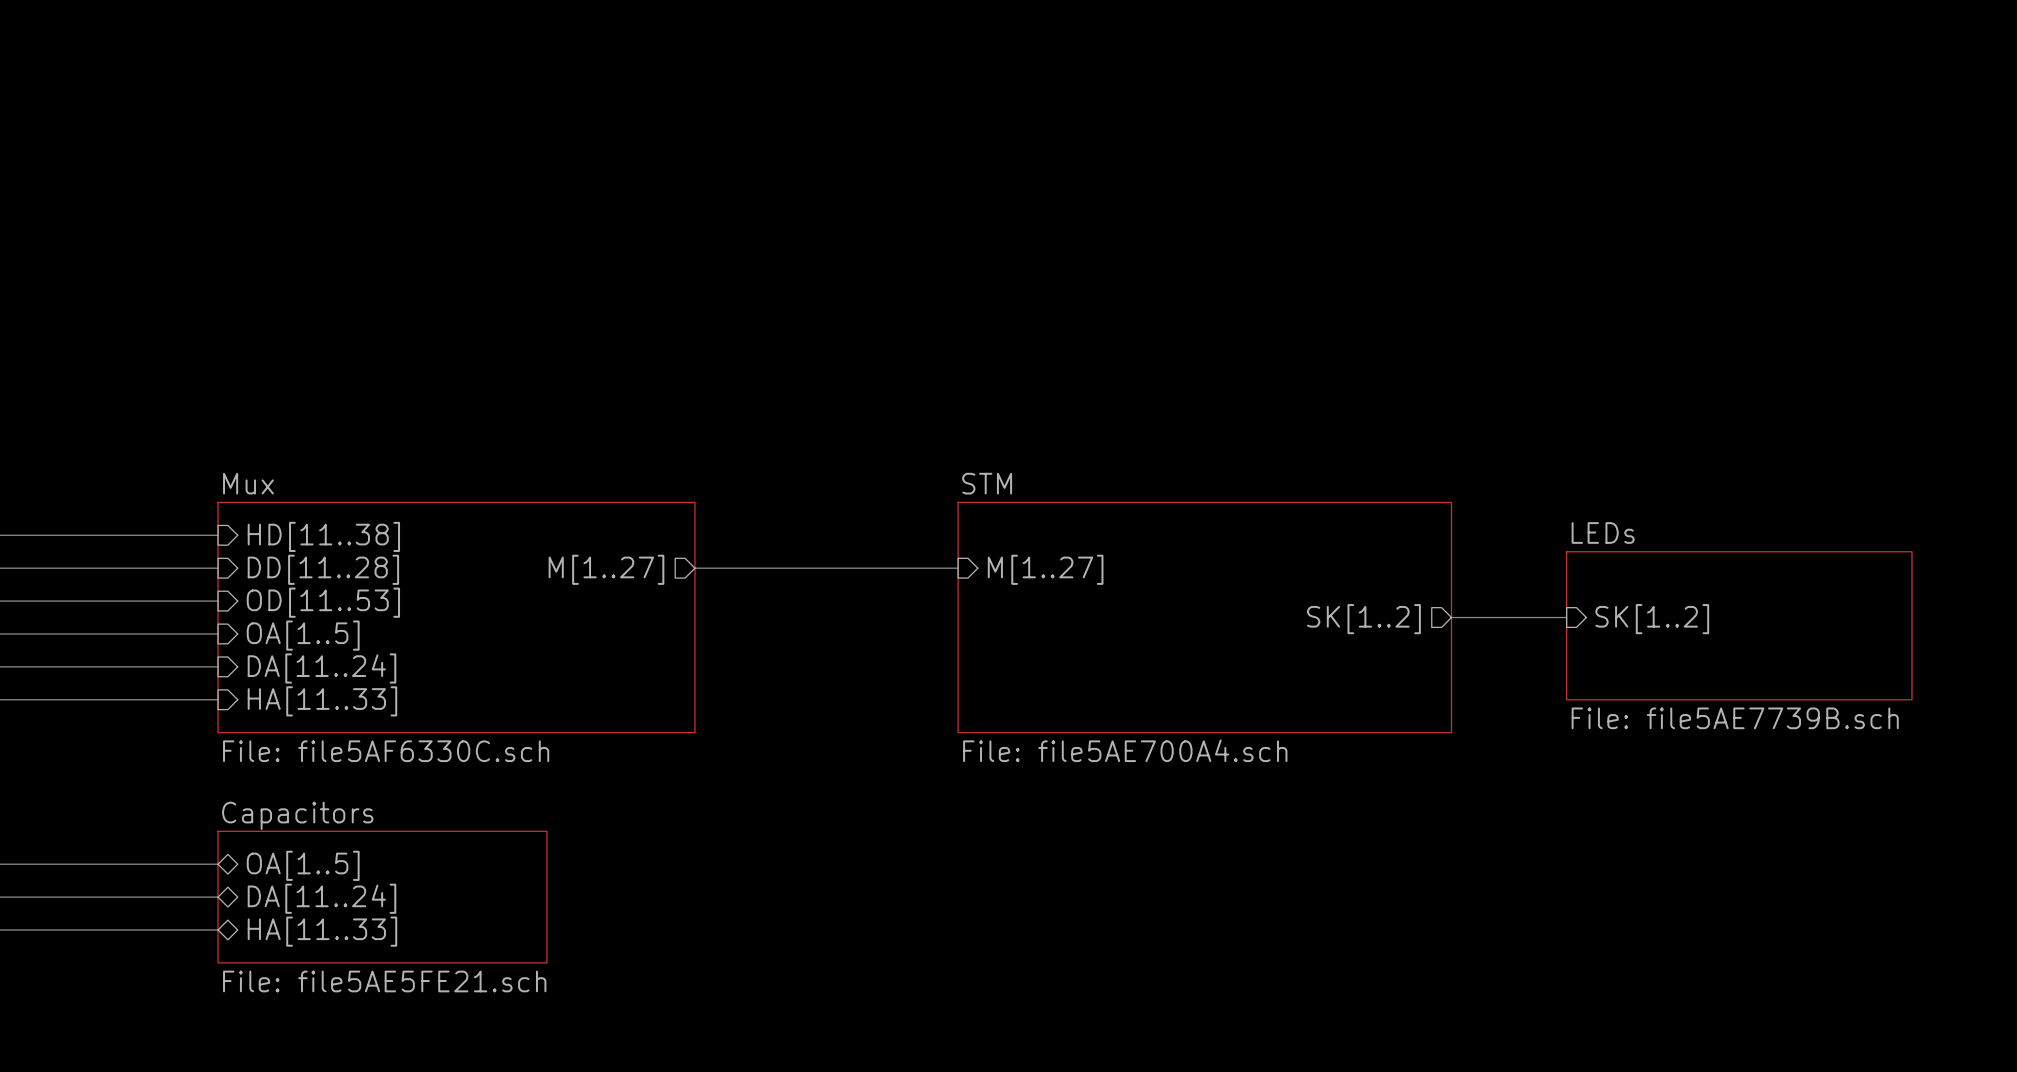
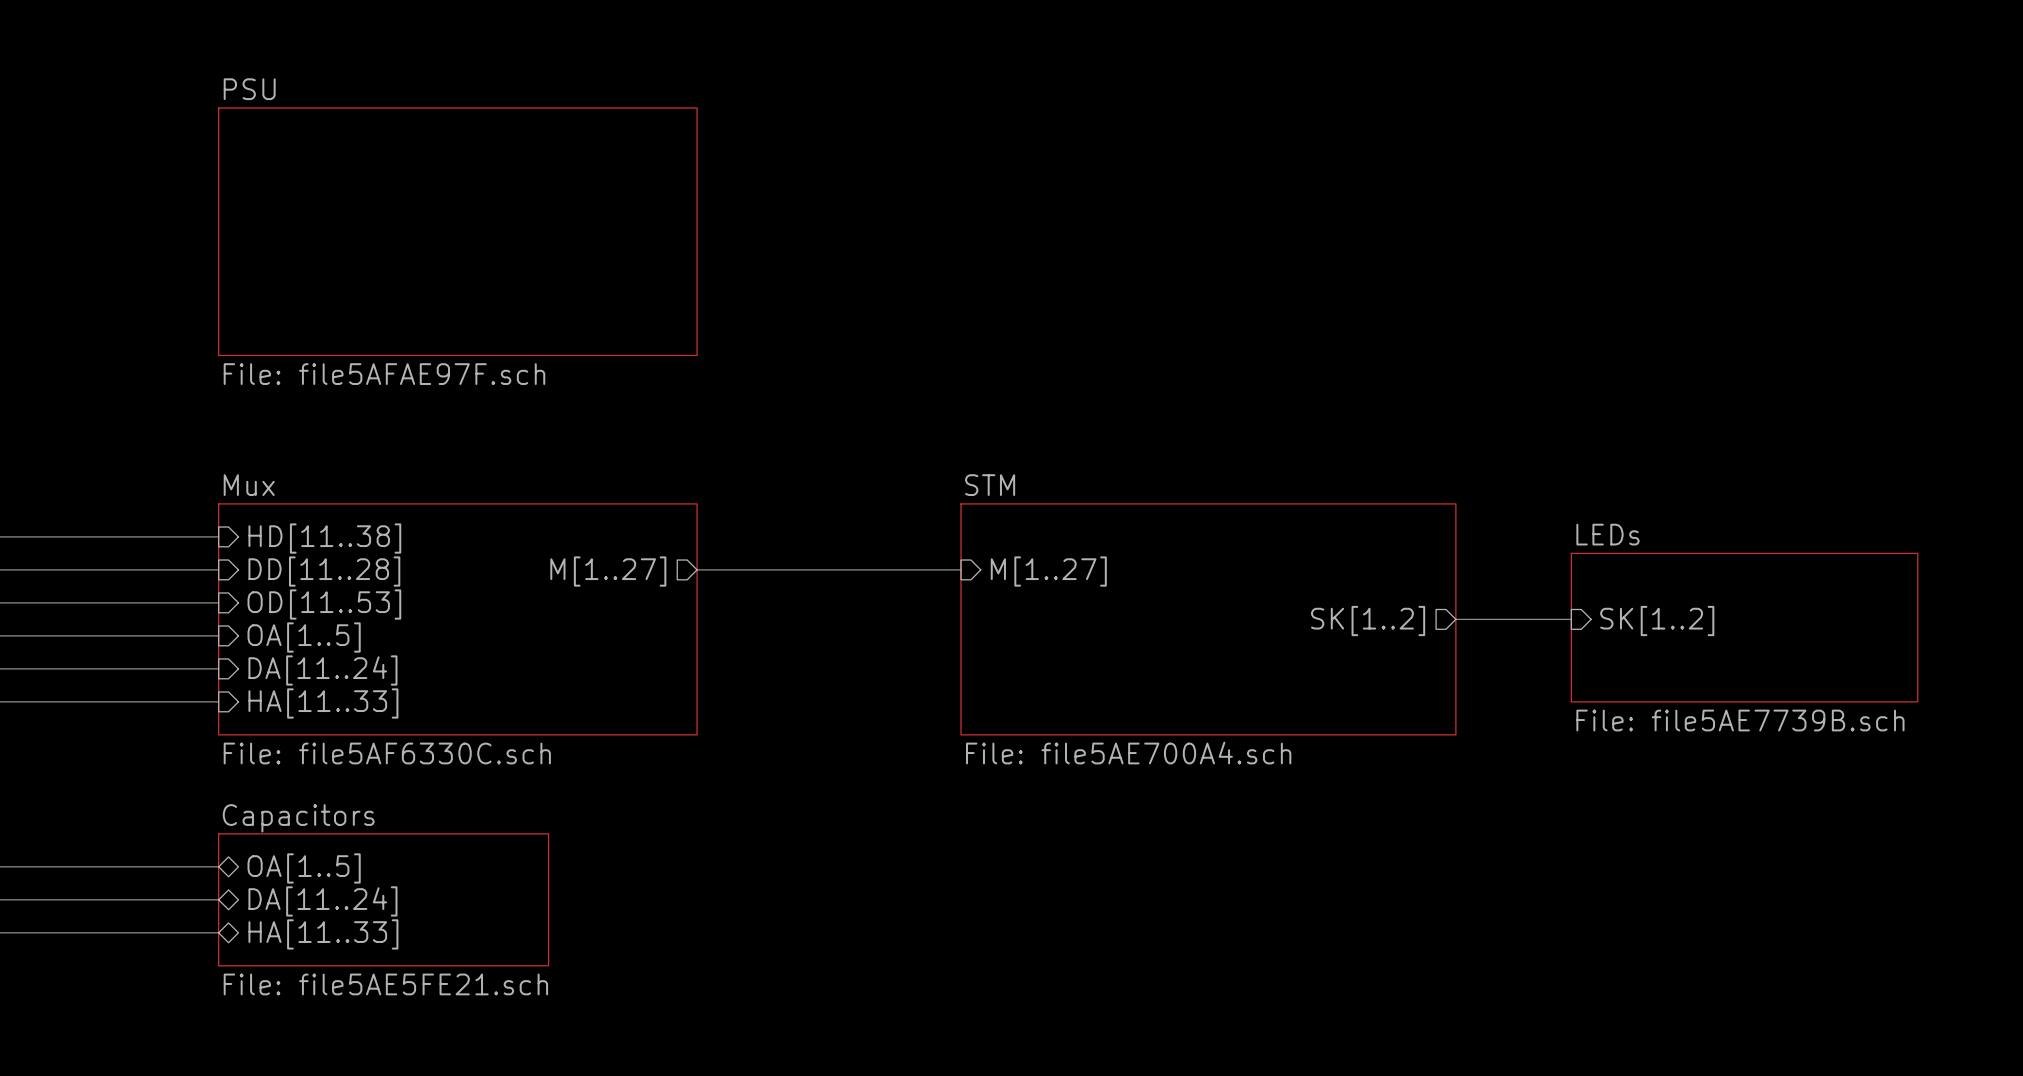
sheet PSU: none -> File: file5AFAE97F.sch (457, 231)

